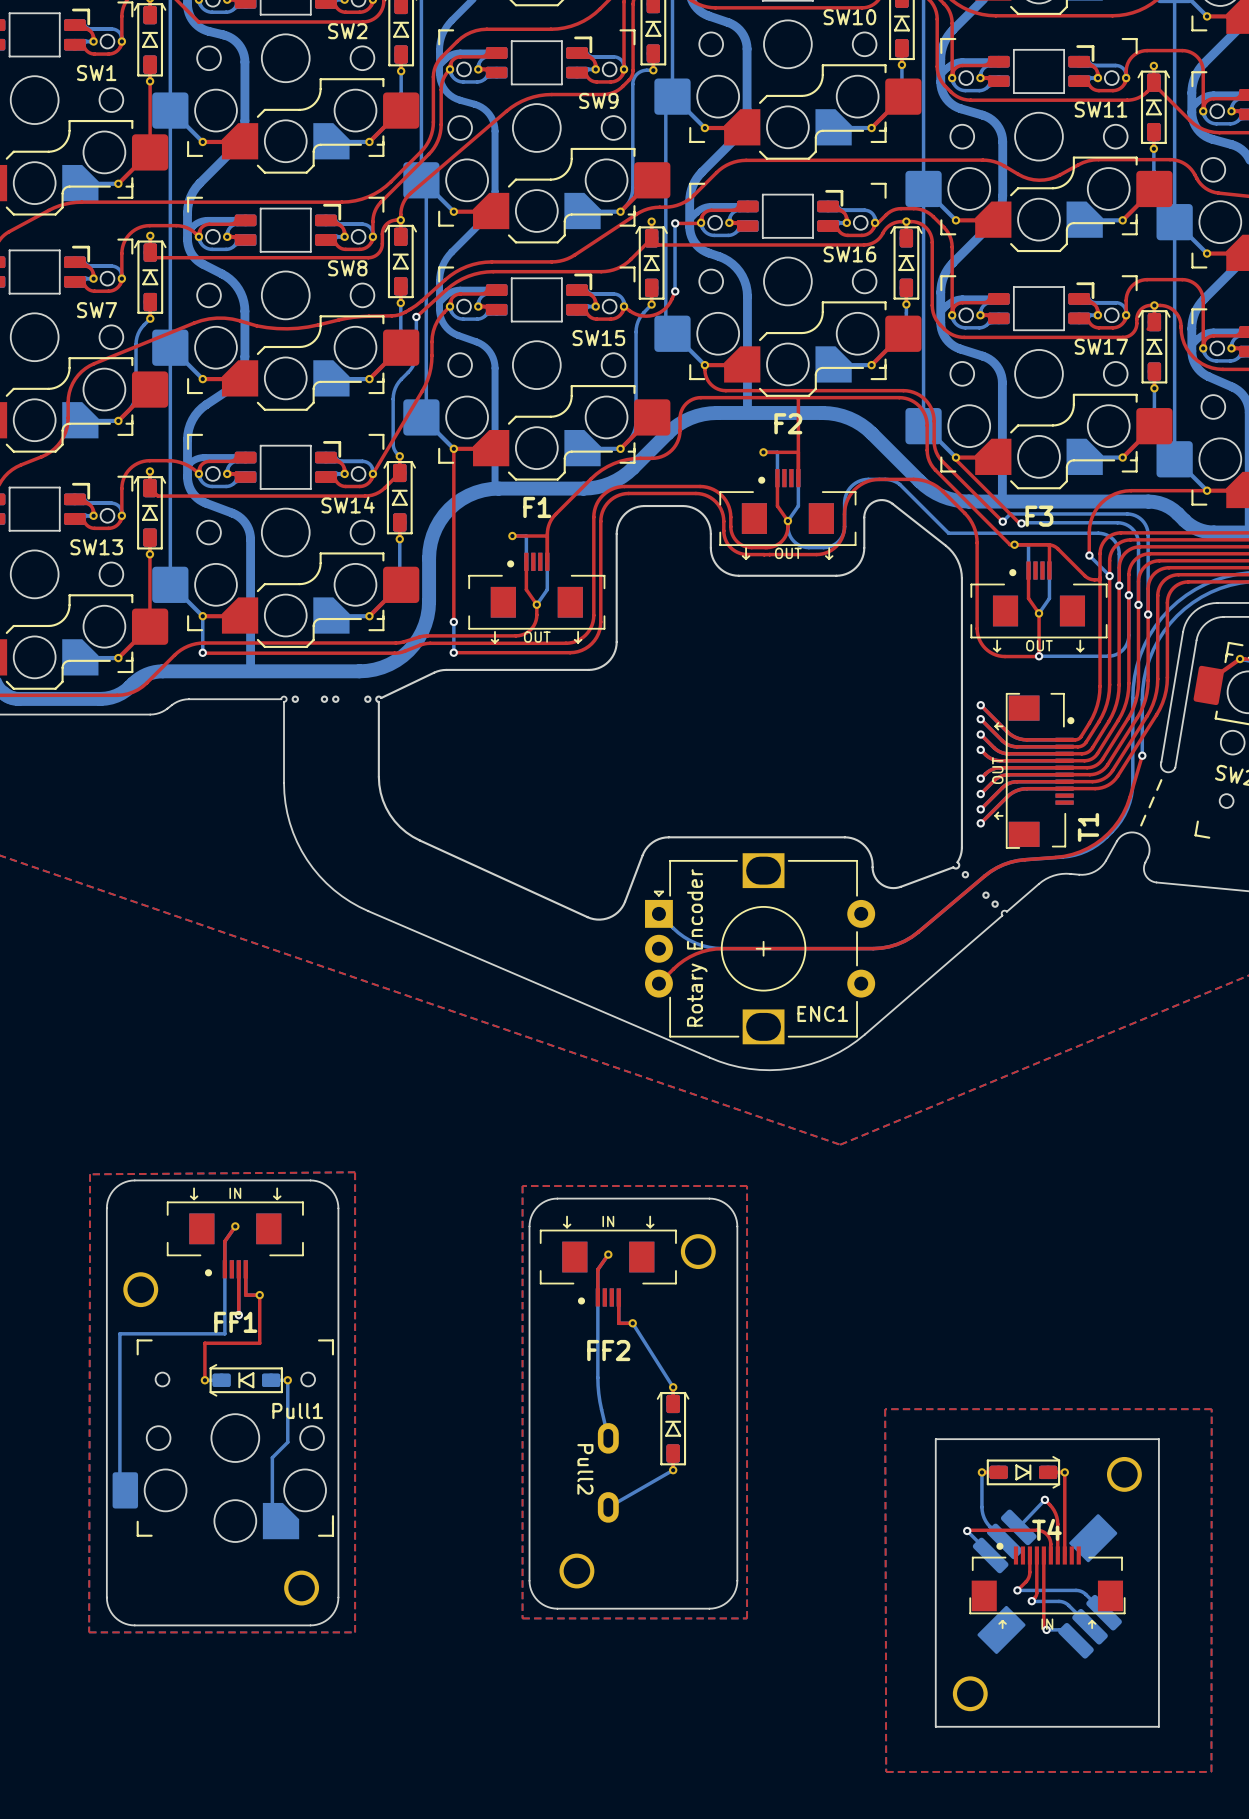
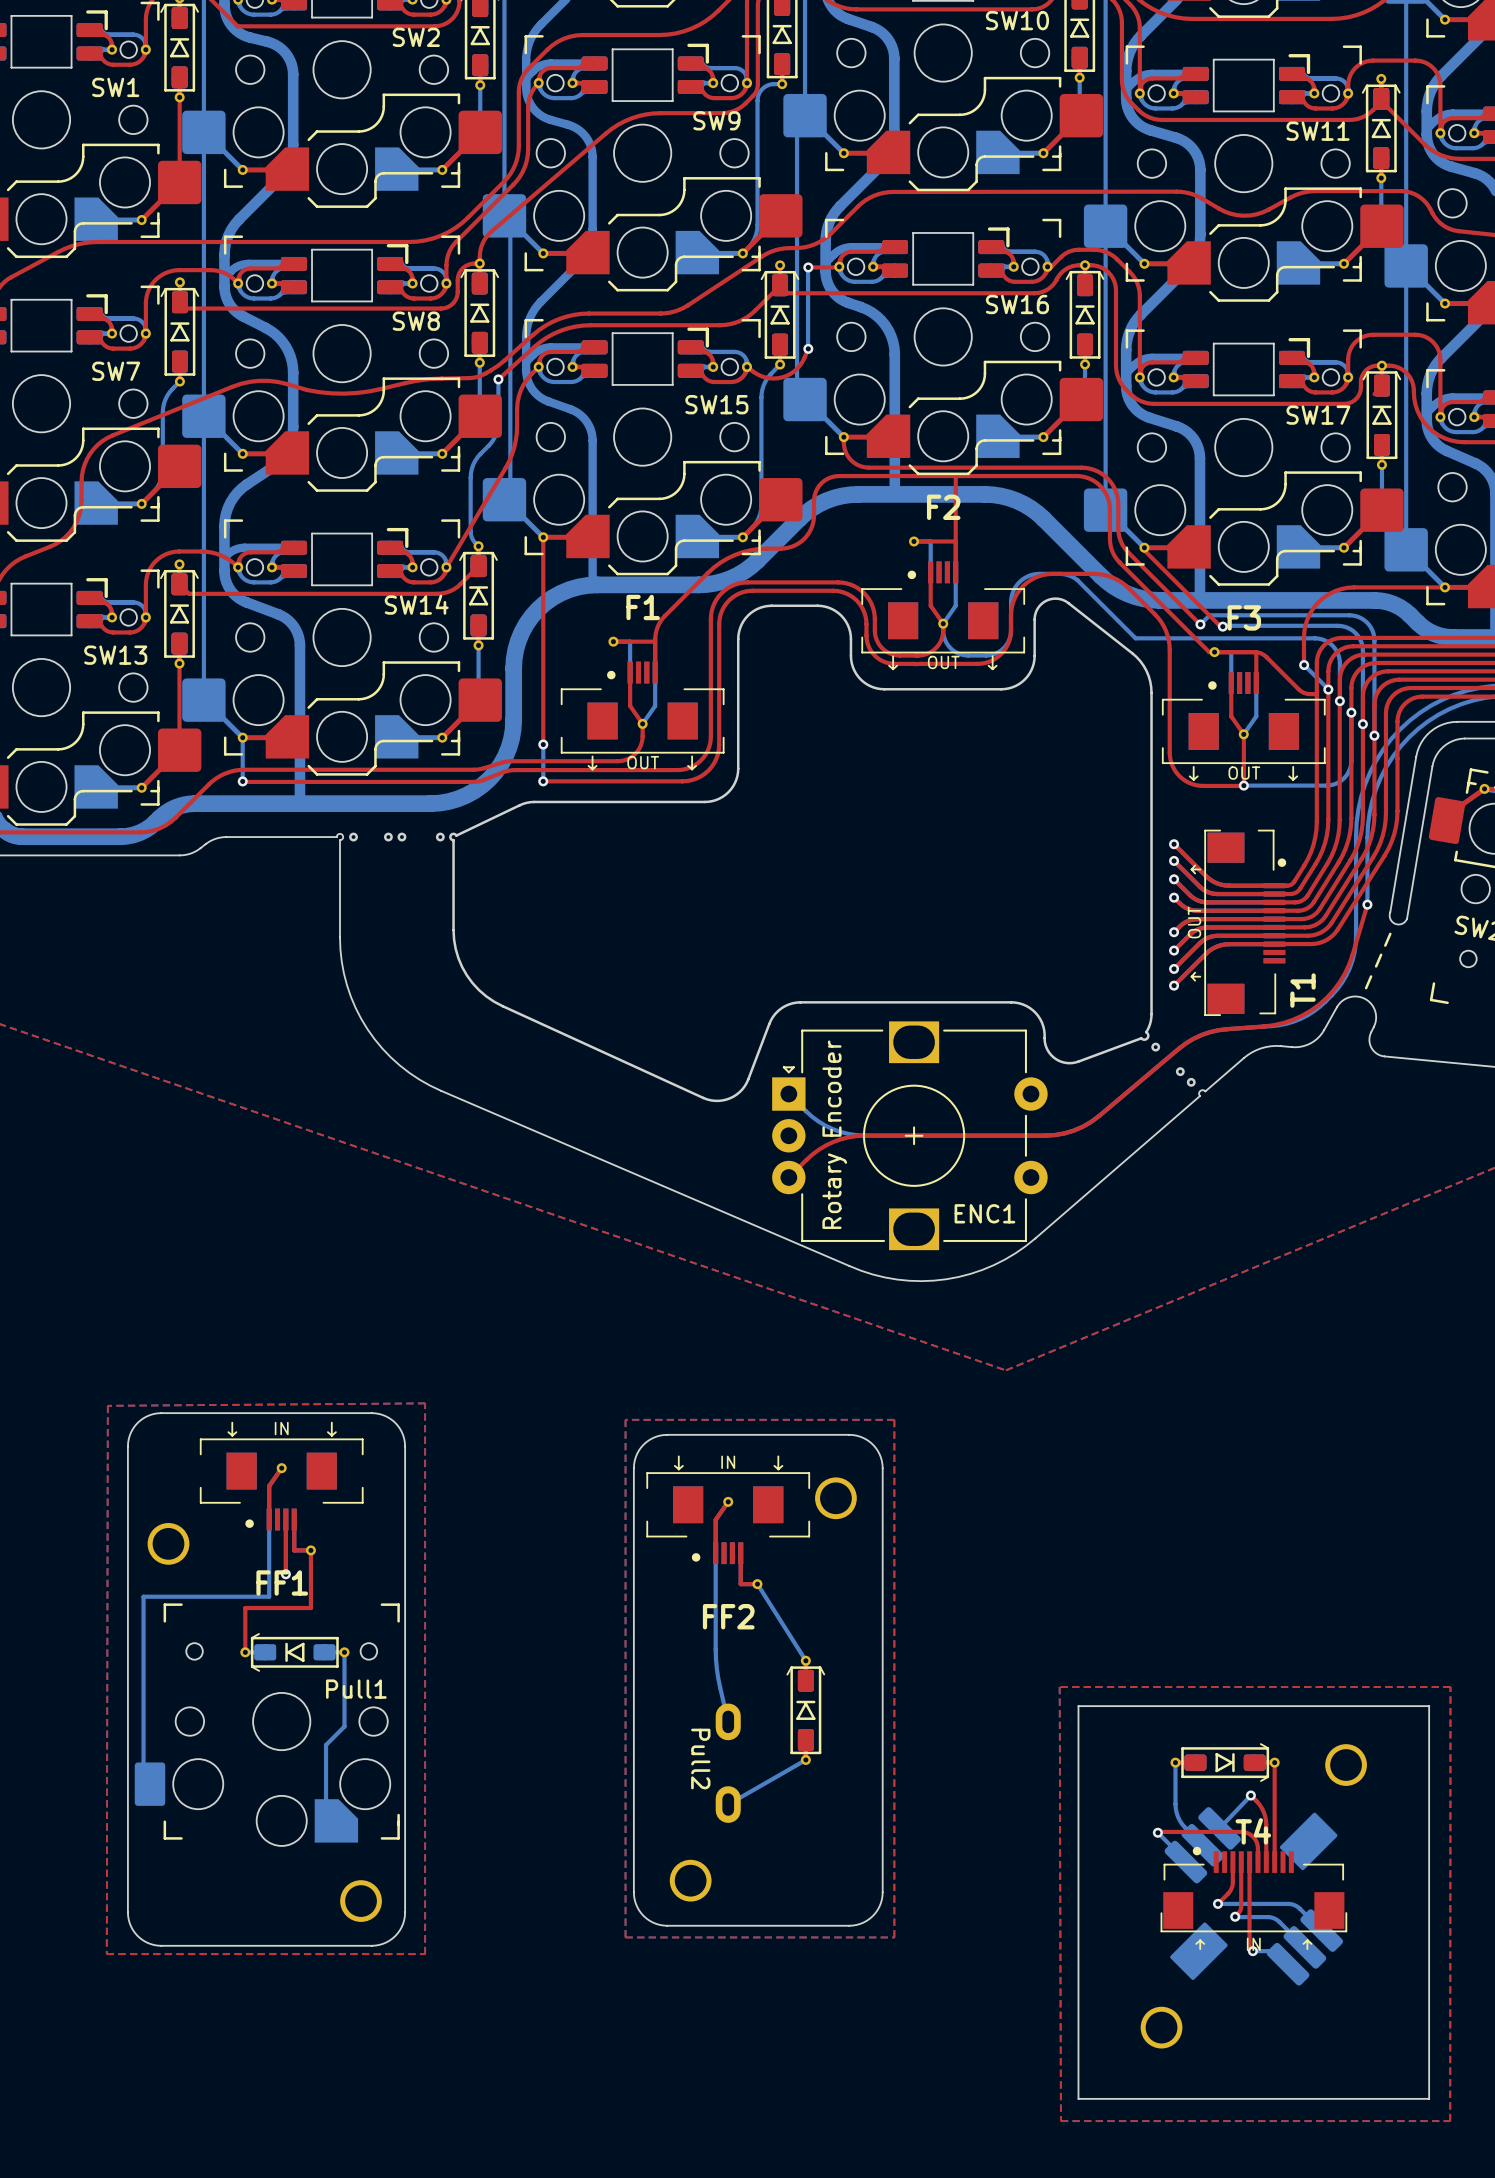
board edge: (935, 1439) (1158, 1439) (1158, 1726) (935, 1726) (935, 1439) -> (1078, 1706) (1078, 2098) (1429, 2098) (1429, 1706) (1078, 1706)

